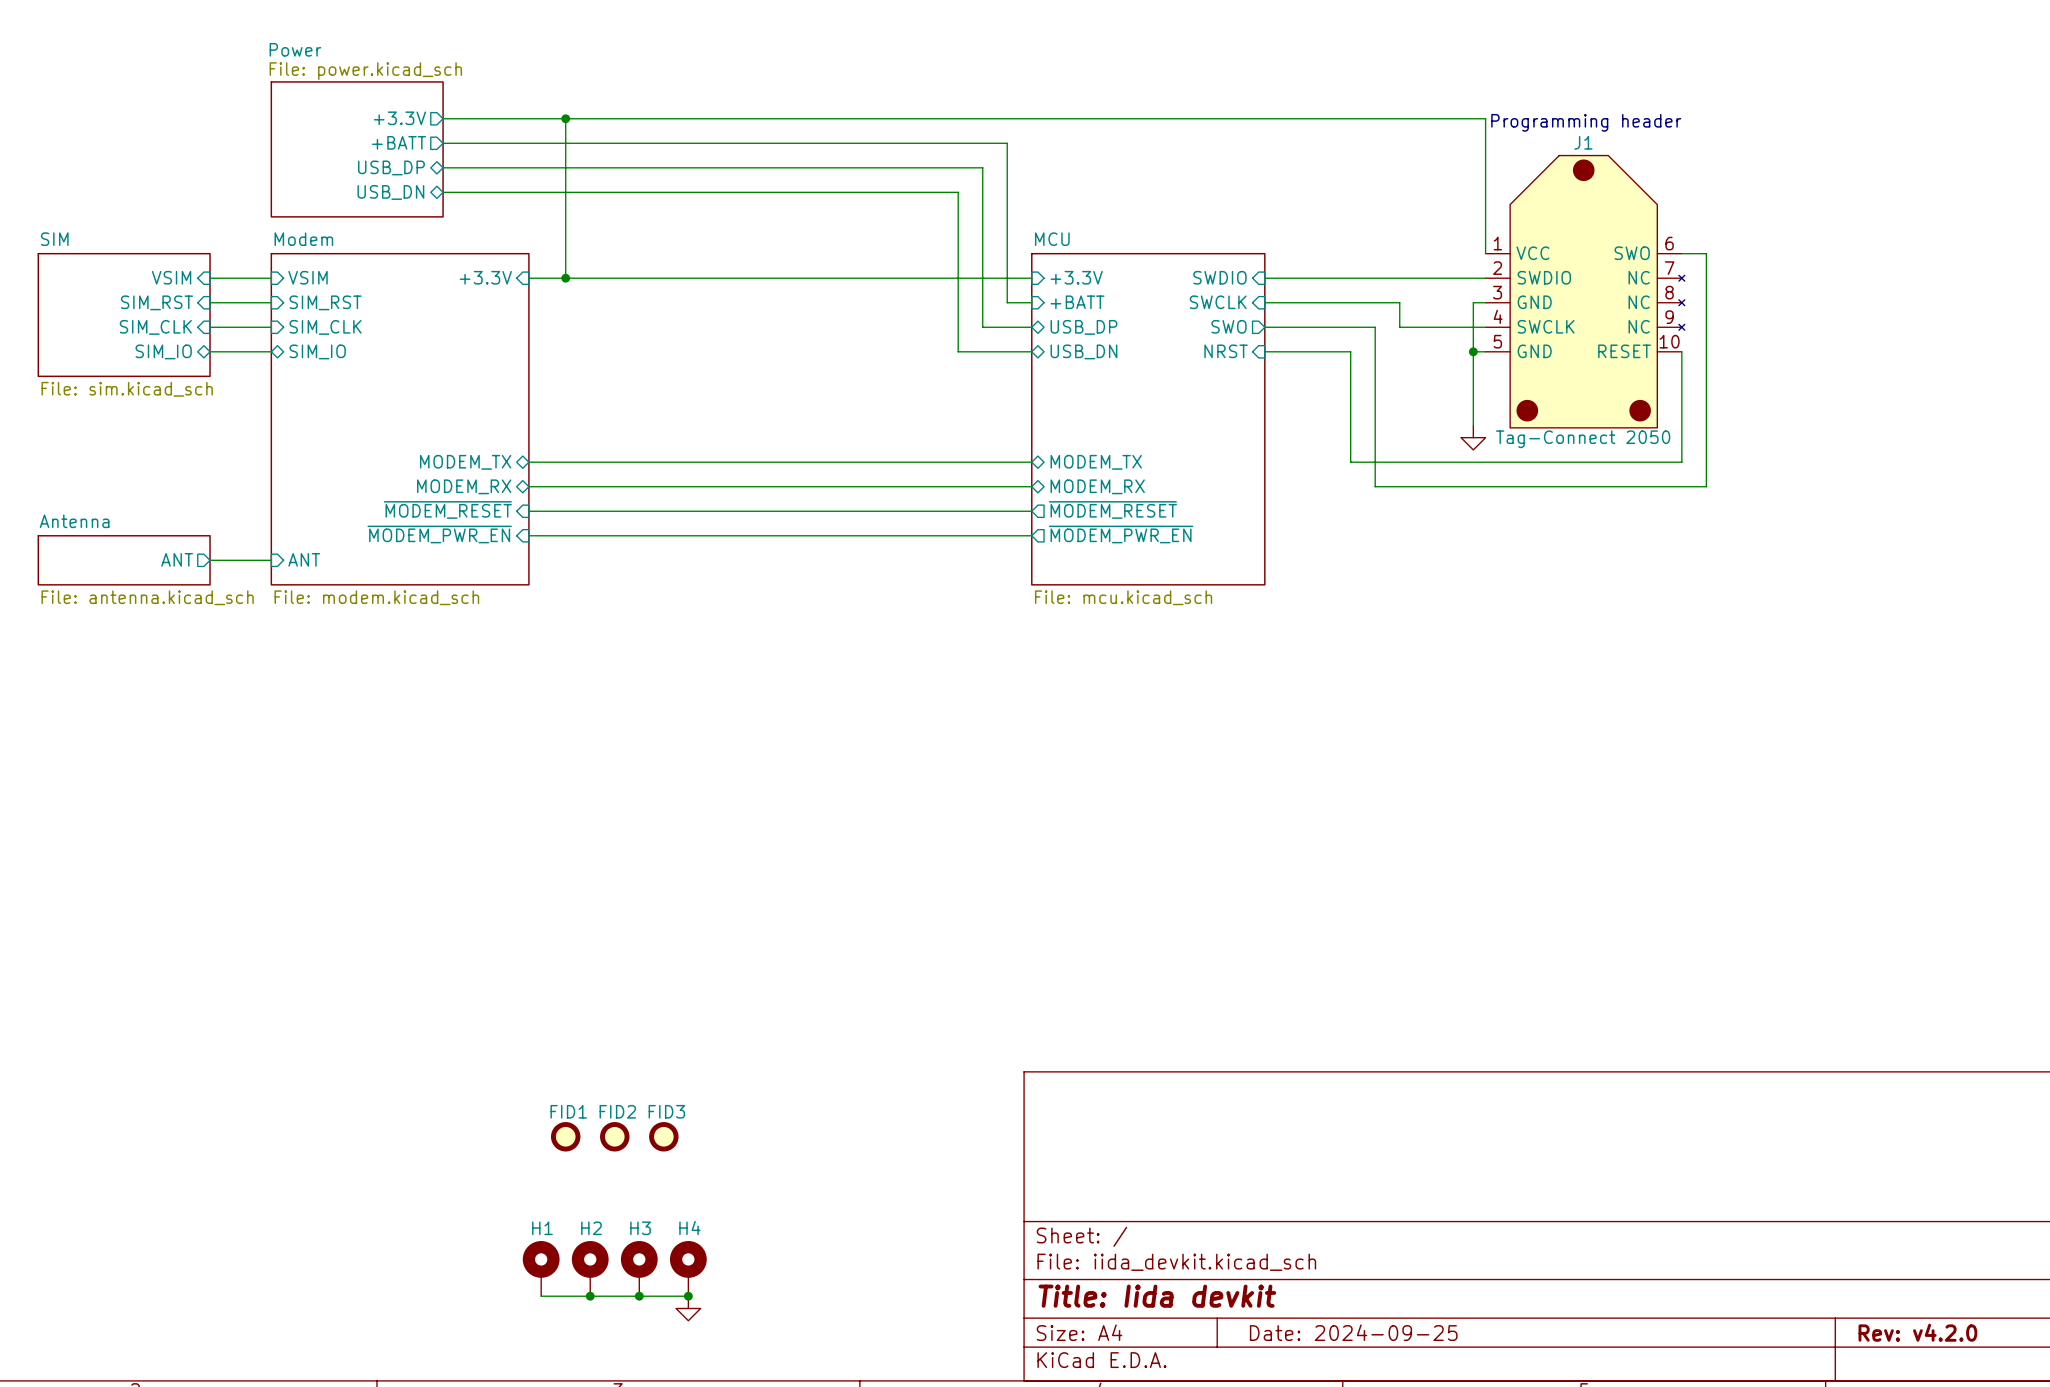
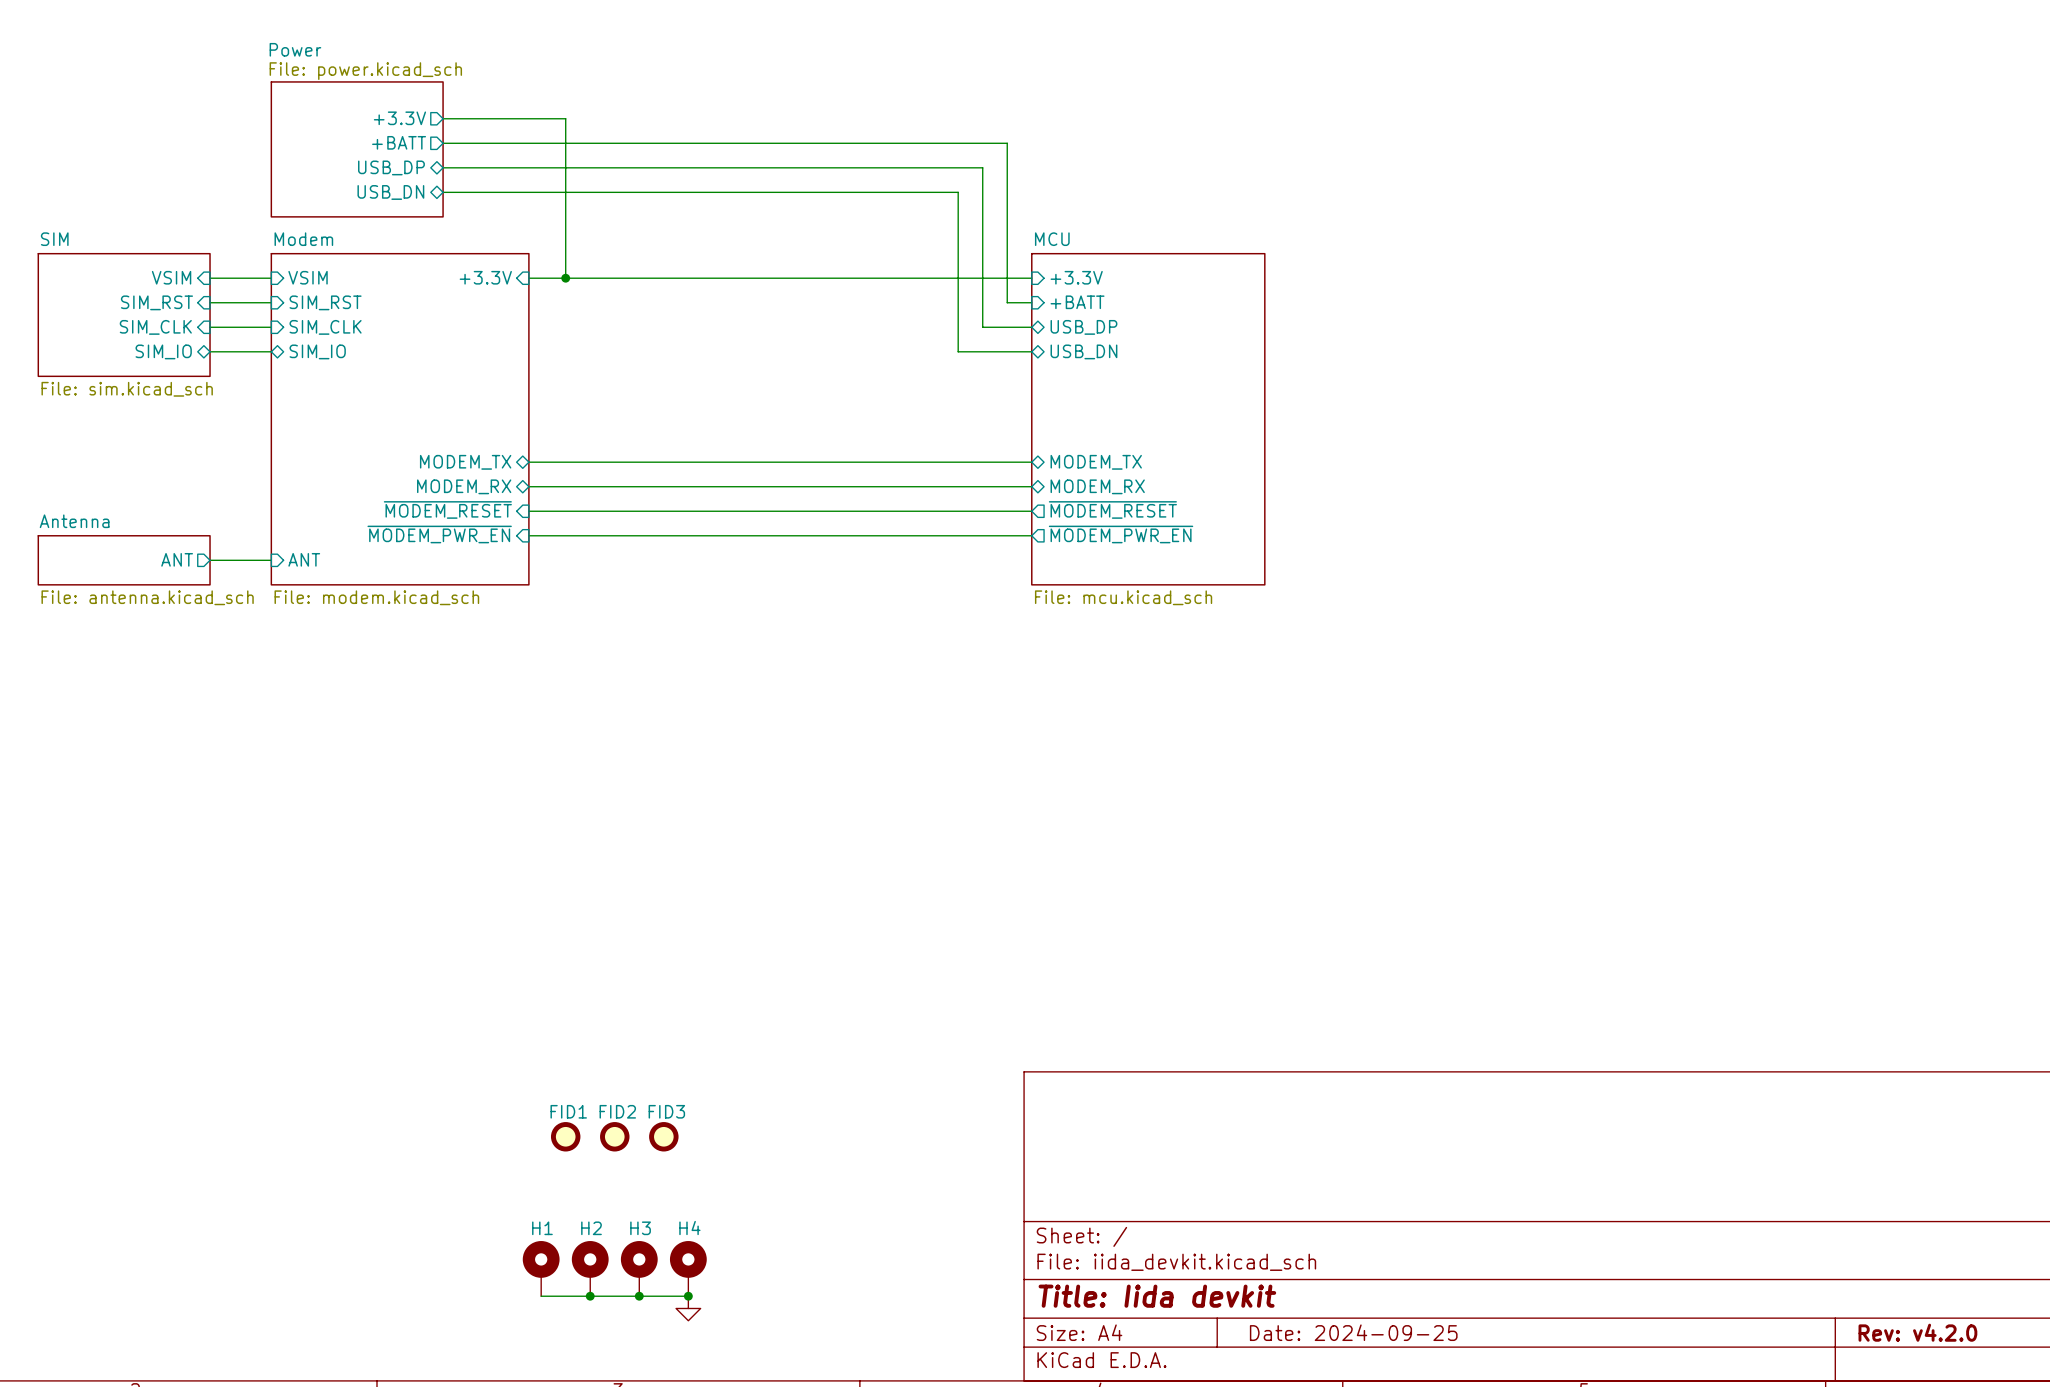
wire: (565, 118) (1485, 118) (1485, 253) -> none
junction: (565, 118) -> none
text: Programming header (1586, 122) -> none
wire: (1681, 253) (1706, 253) (1706, 486) (1375, 486) (1375, 327) (1264, 327) -> none
sheet pin: SWDIO (1219, 277) -> none
wire: (1264, 278) (1485, 278) -> none
J1: Tag-Connect 2050 (1585, 291) -> none
sheet pin: SWCLK (1218, 302) -> none
wire: (1264, 302) (1399, 302) (1399, 327) (1485, 327) -> none
wire: (1485, 302) (1473, 302) (1473, 425) -> none
sheet pin: SWO (1229, 326) -> none
sheet pin: NRST (1226, 351) -> none
wire: (1264, 351) (1350, 351) (1350, 462) (1681, 462) (1681, 351) -> none
wire: (1473, 351) (1485, 351) -> none
junction: (1473, 351) -> none
power symbol: (1473, 437) -> none

